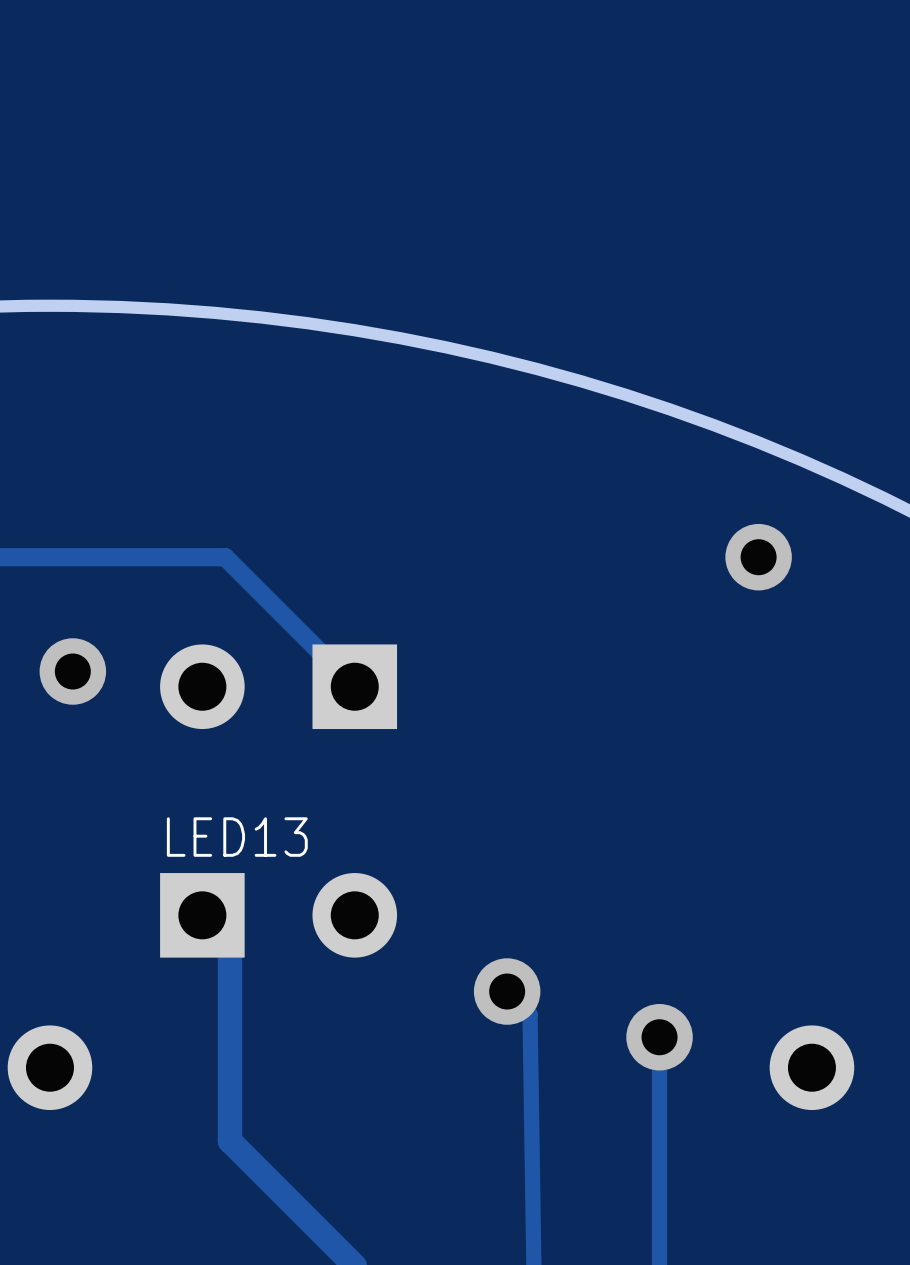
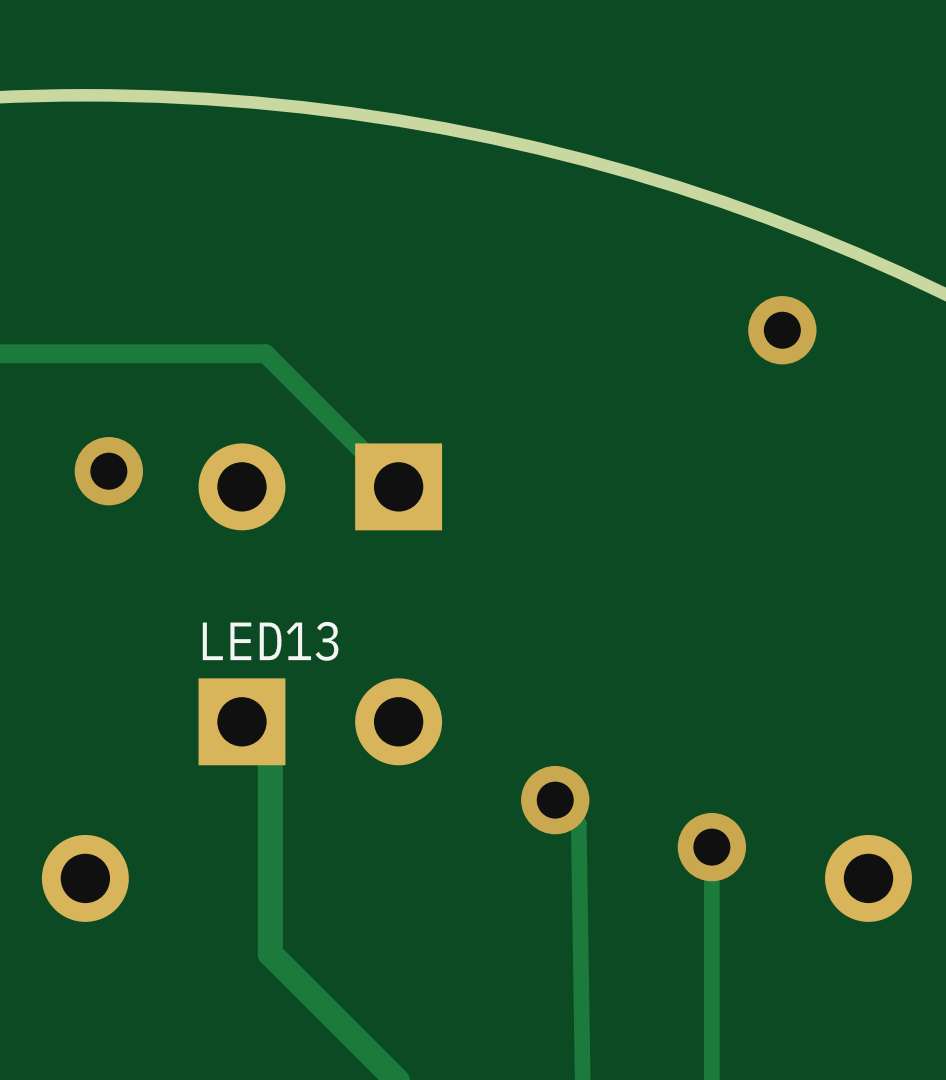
via position: (758, 557) -> (782, 330)

